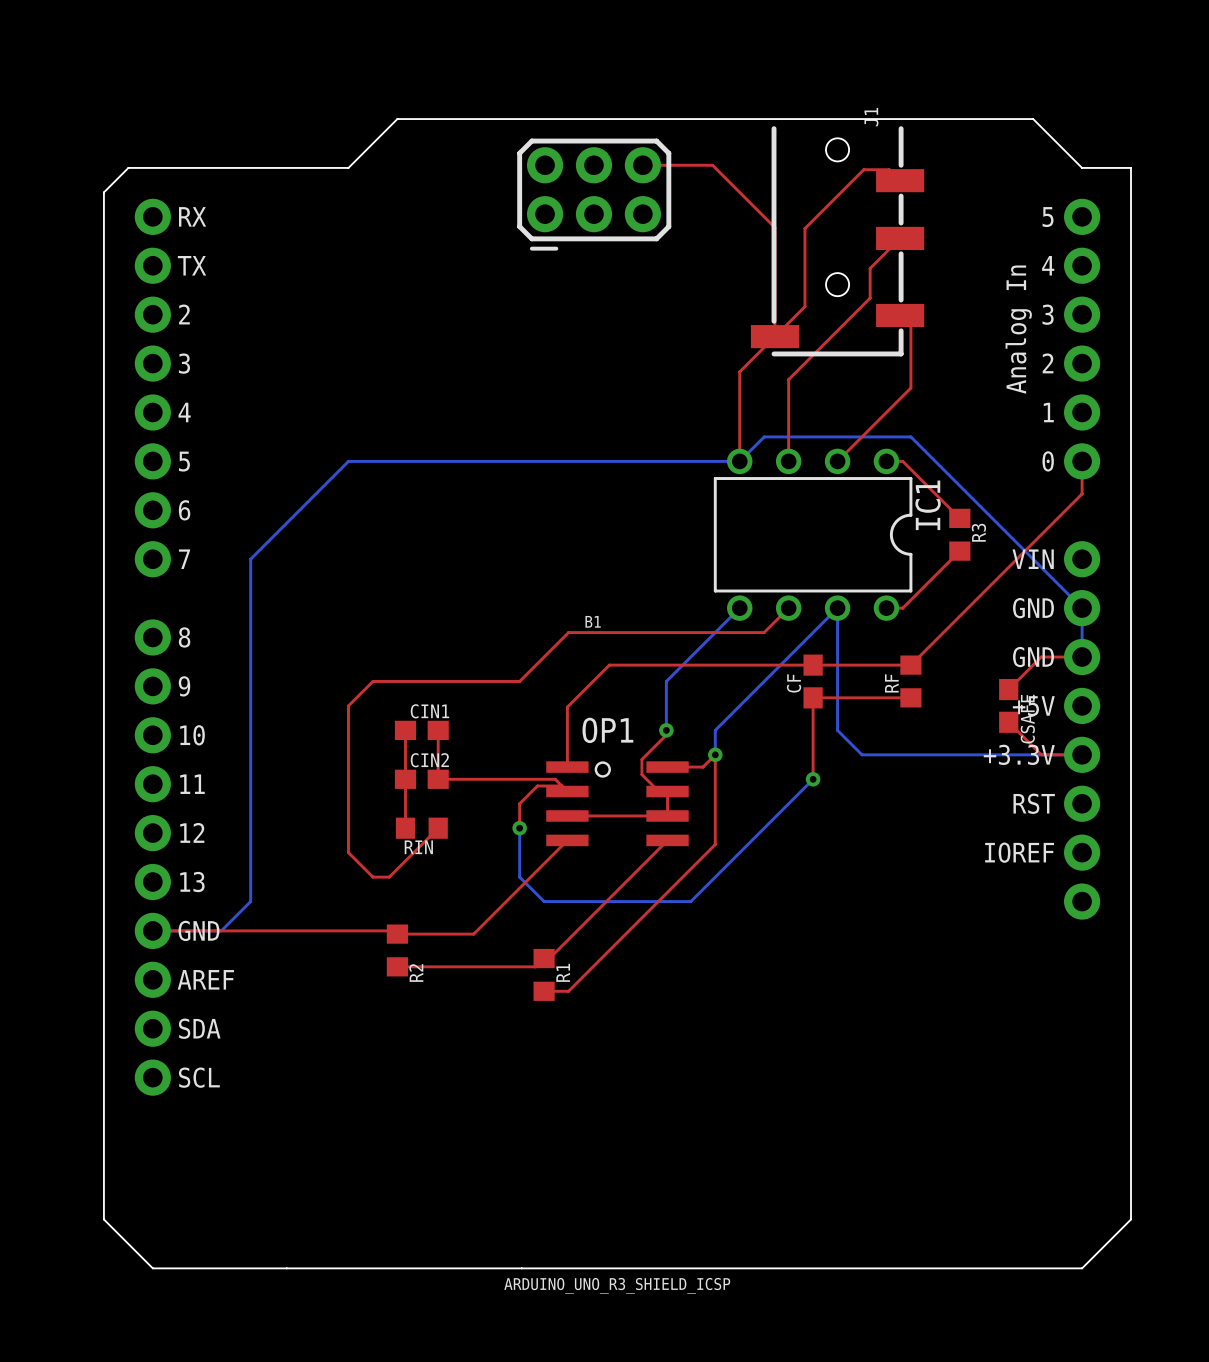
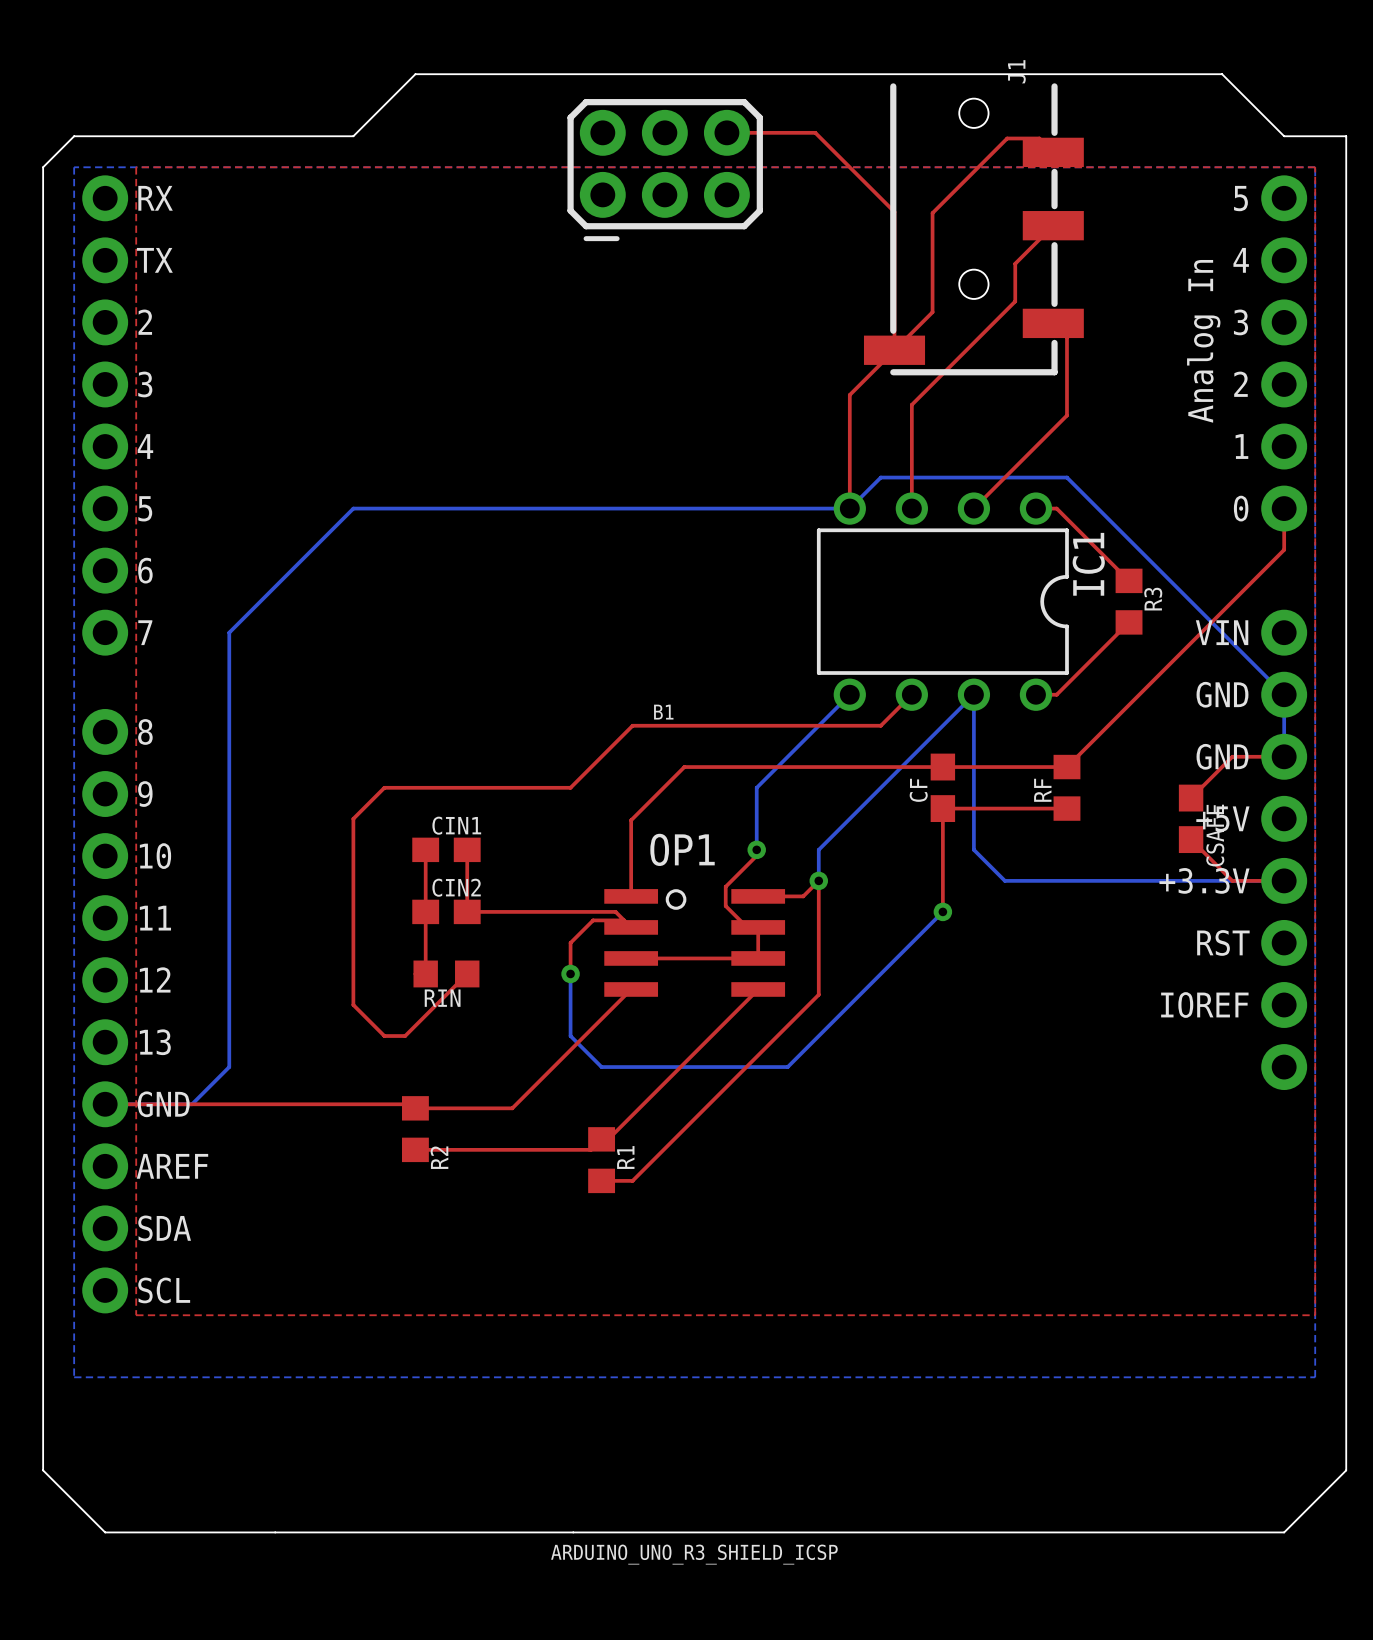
bottom zone outline: none -> (74, 167) (74, 1377) (1315, 1377) (1315, 167) (74, 167)
top zone outline: none -> (136, 167) (136, 1315) (1315, 1315) (1315, 167) (136, 167)

